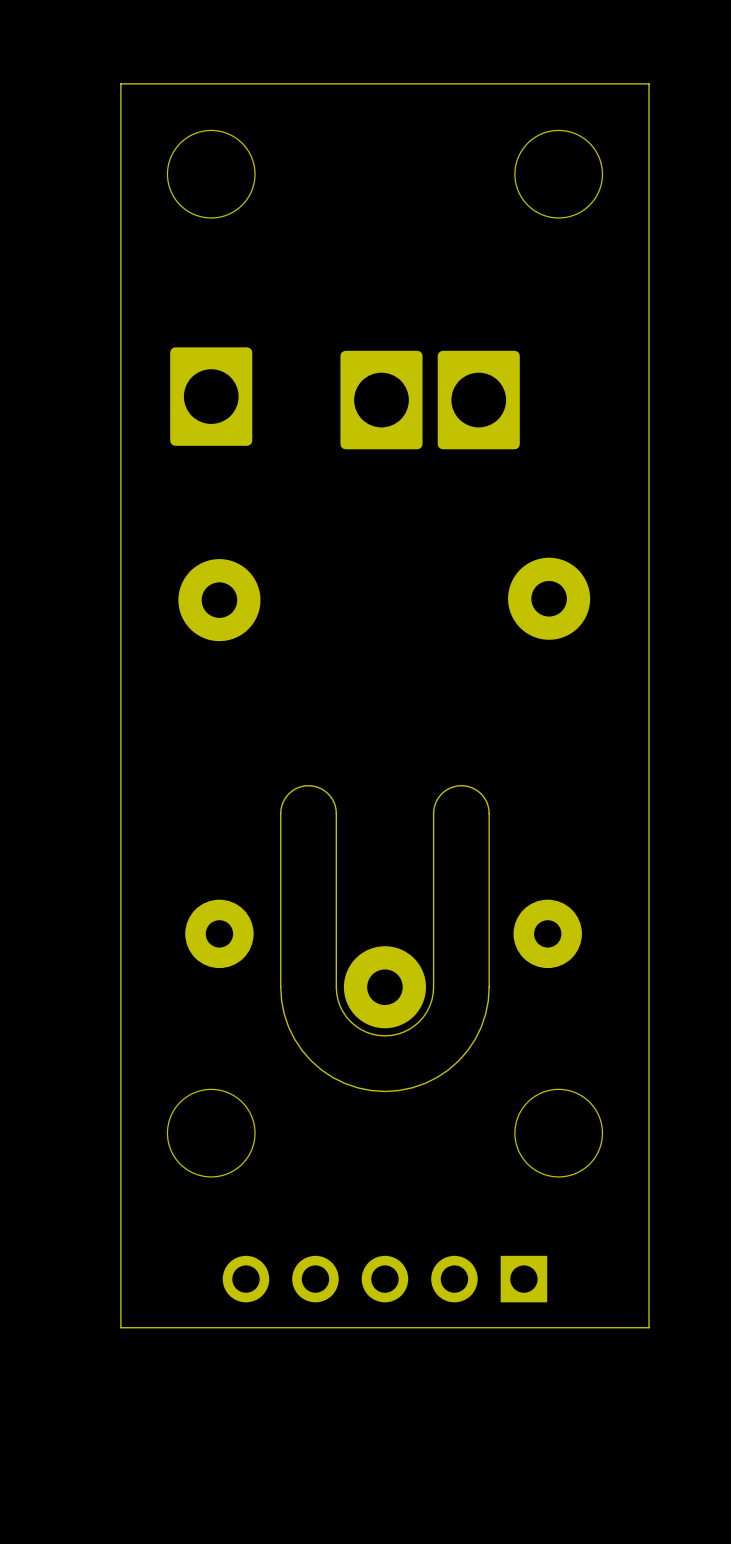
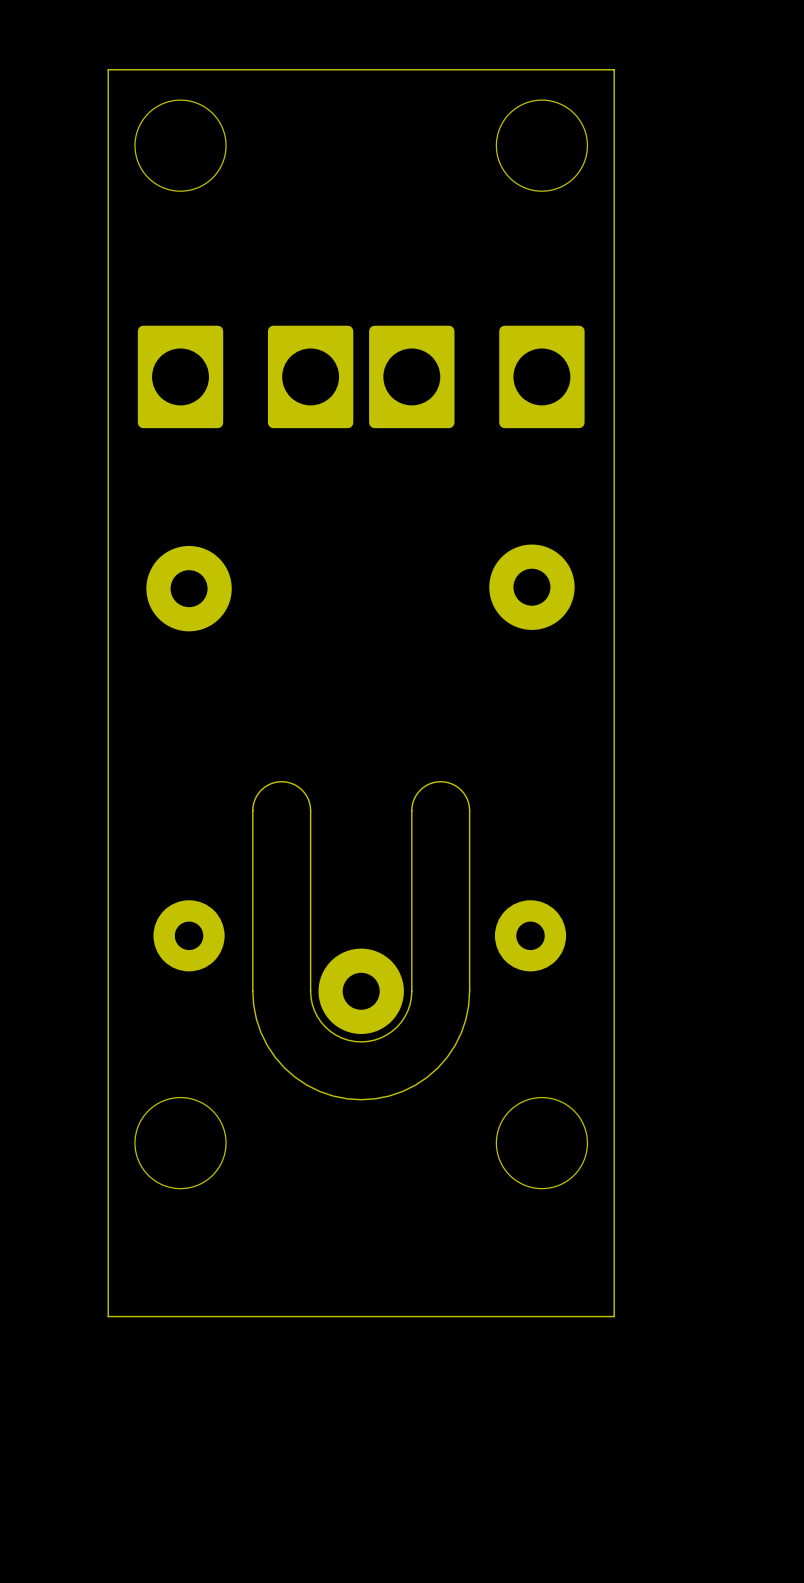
board edge: (649, 83) (649, 1327) (120, 1327) (120, 83) (649, 83) -> (614, 69) (614, 1316) (108, 1316) (108, 69) (614, 69)
part: none -> (310, 376)
part: none -> (411, 376)
part: none -> (541, 376)
part: (381, 400) -> none
part: (478, 400) -> none
part: (384, 1279) -> none

